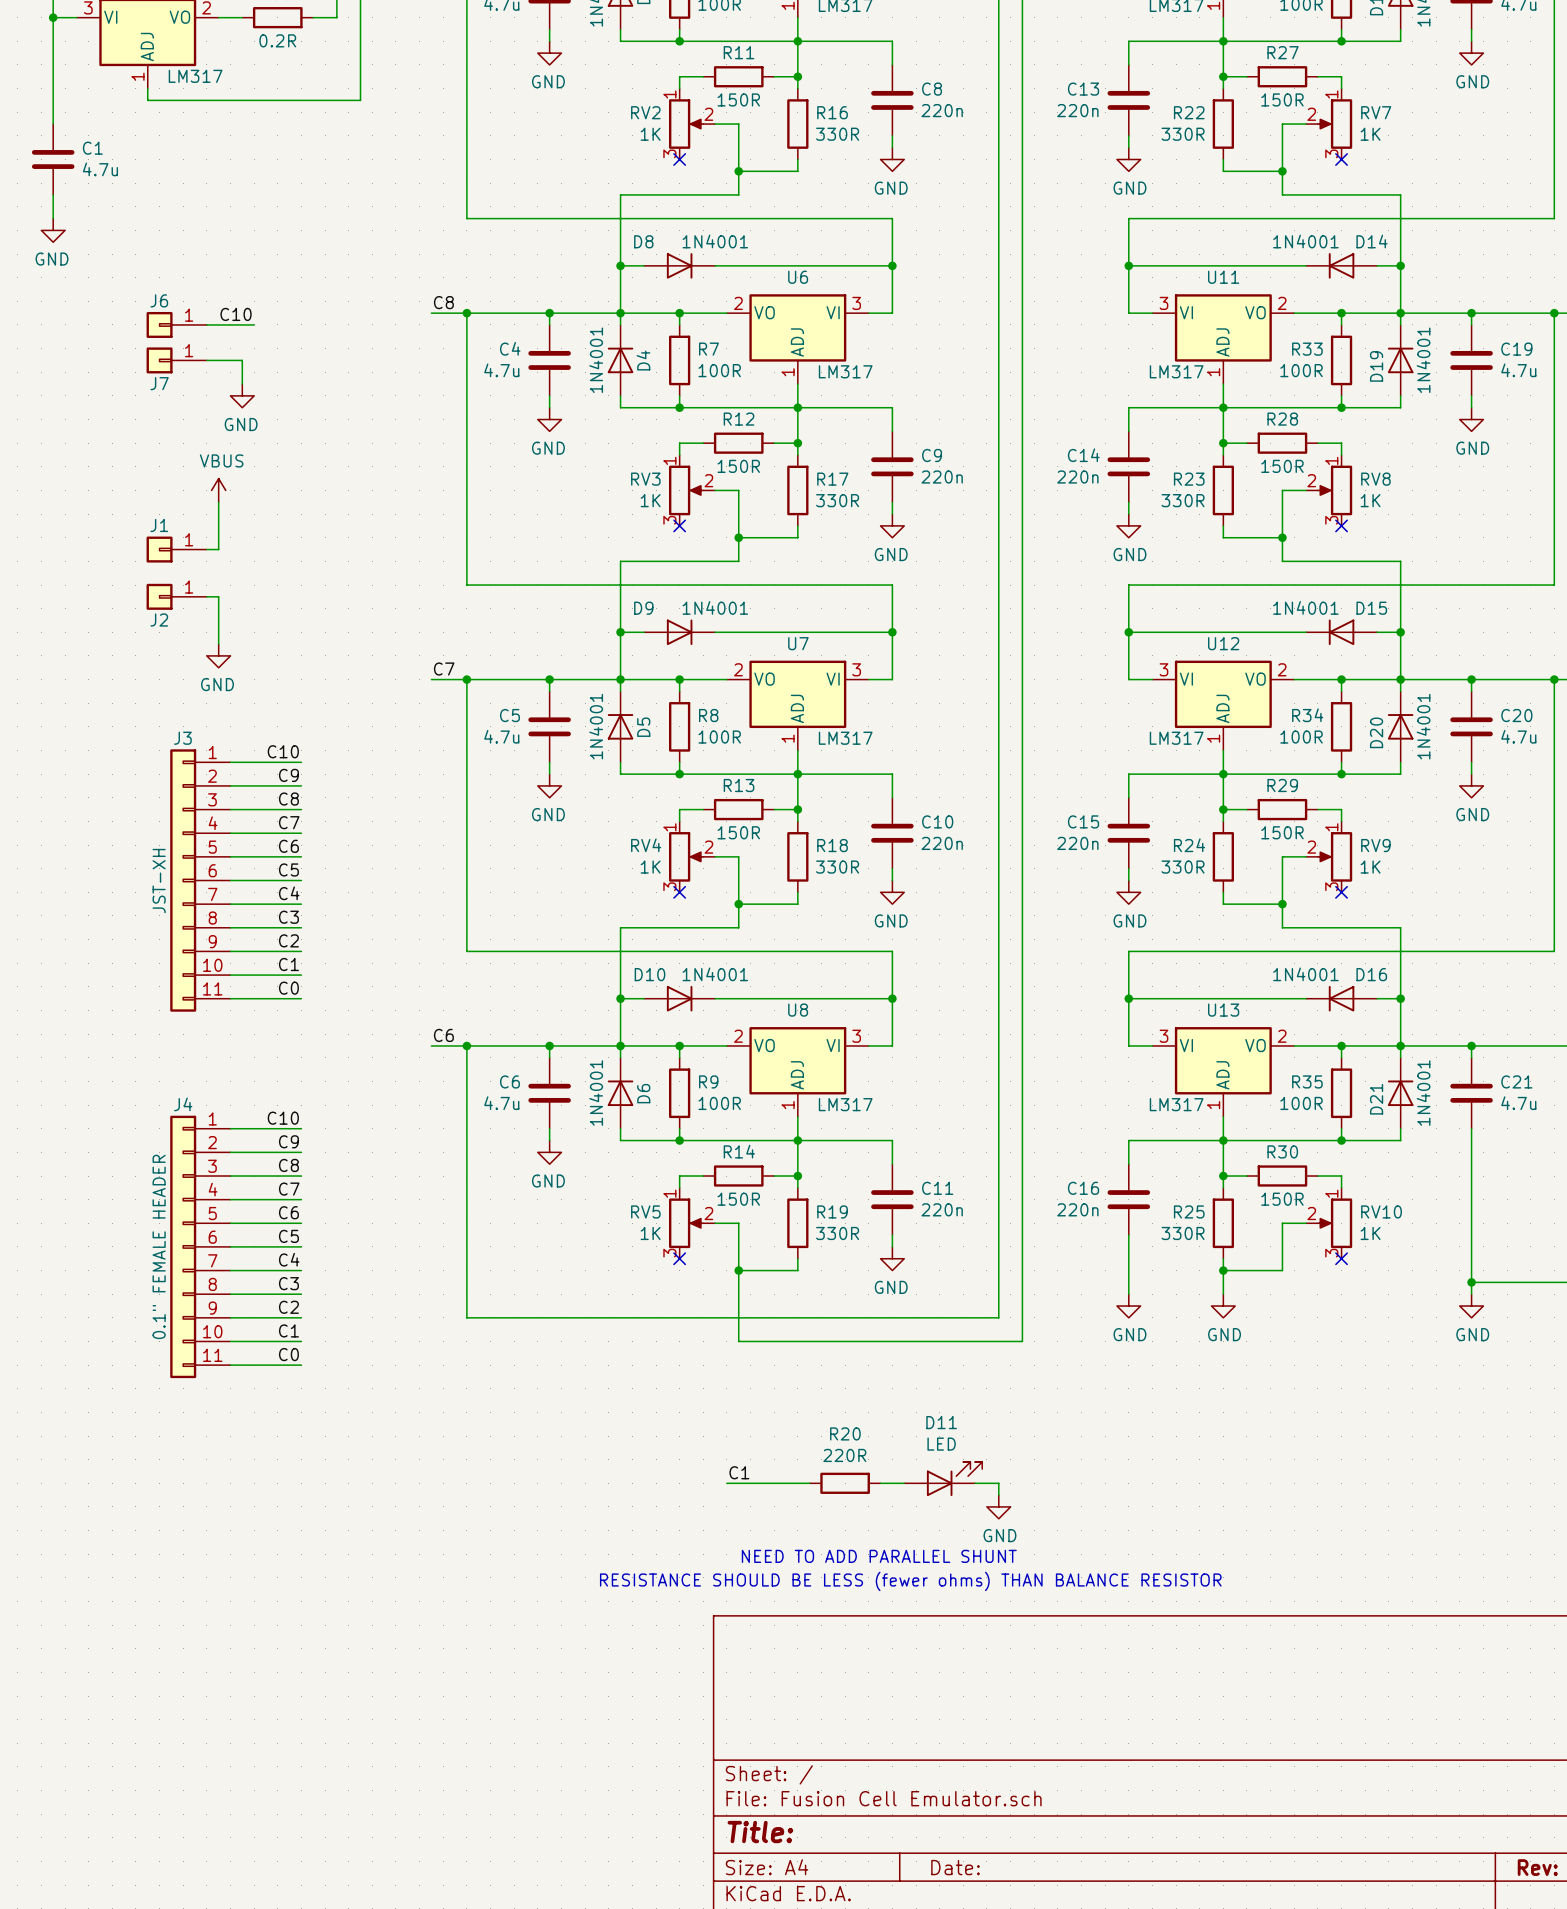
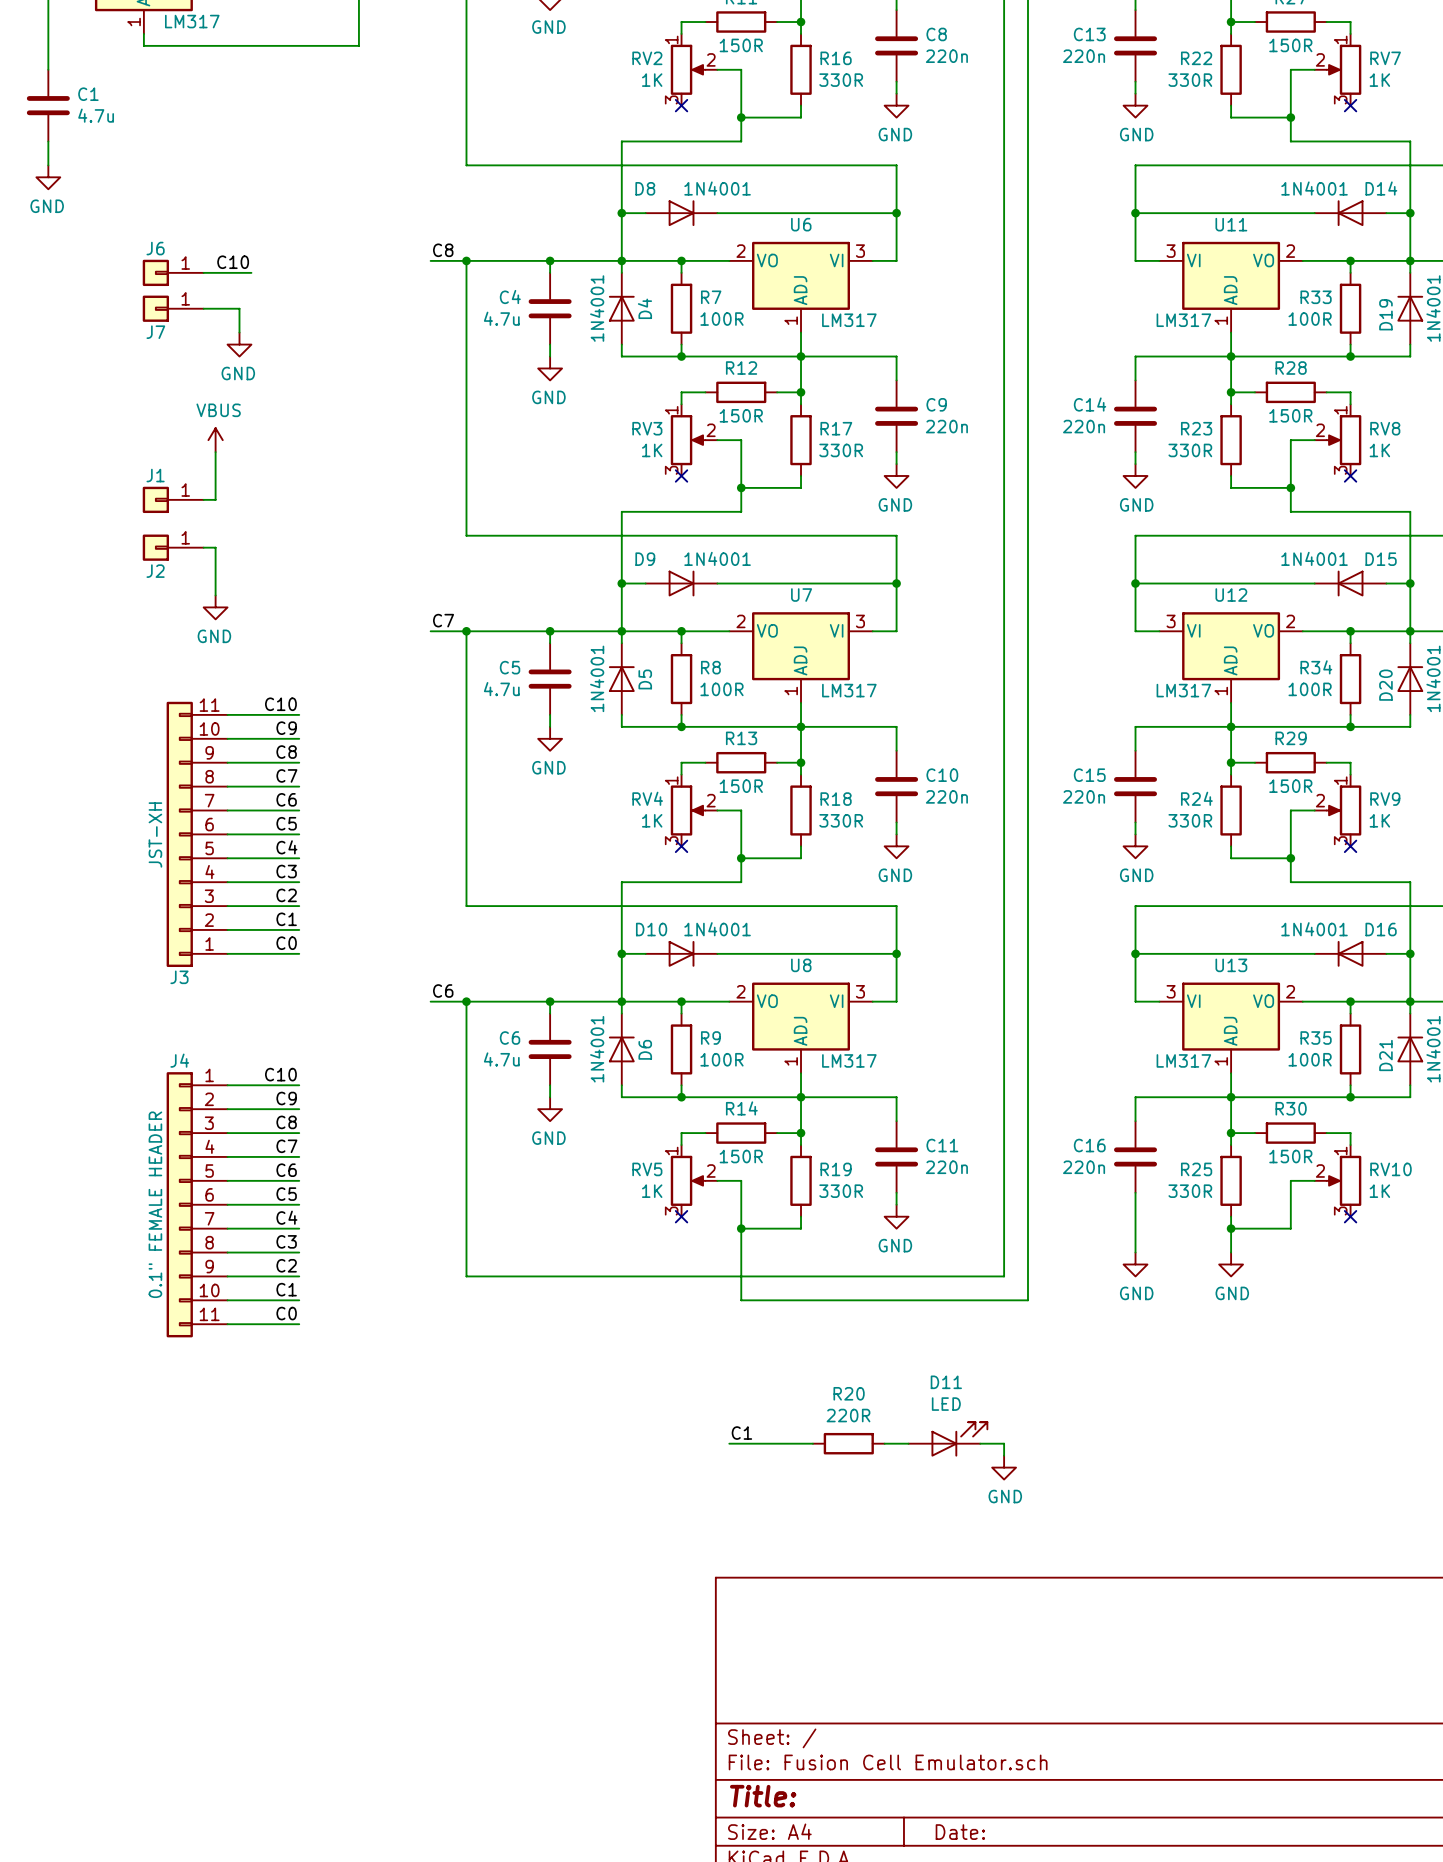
J3 flip: as is (183, 880) -> up-down (179, 834)
text: NEED TO ADD PARALLEL SHUNT (879, 1556) -> none
text: RESISTANCE SHOULD BE LESS (fewer ohms) THAN BALANCE RESISTOR (910, 1581) -> none

